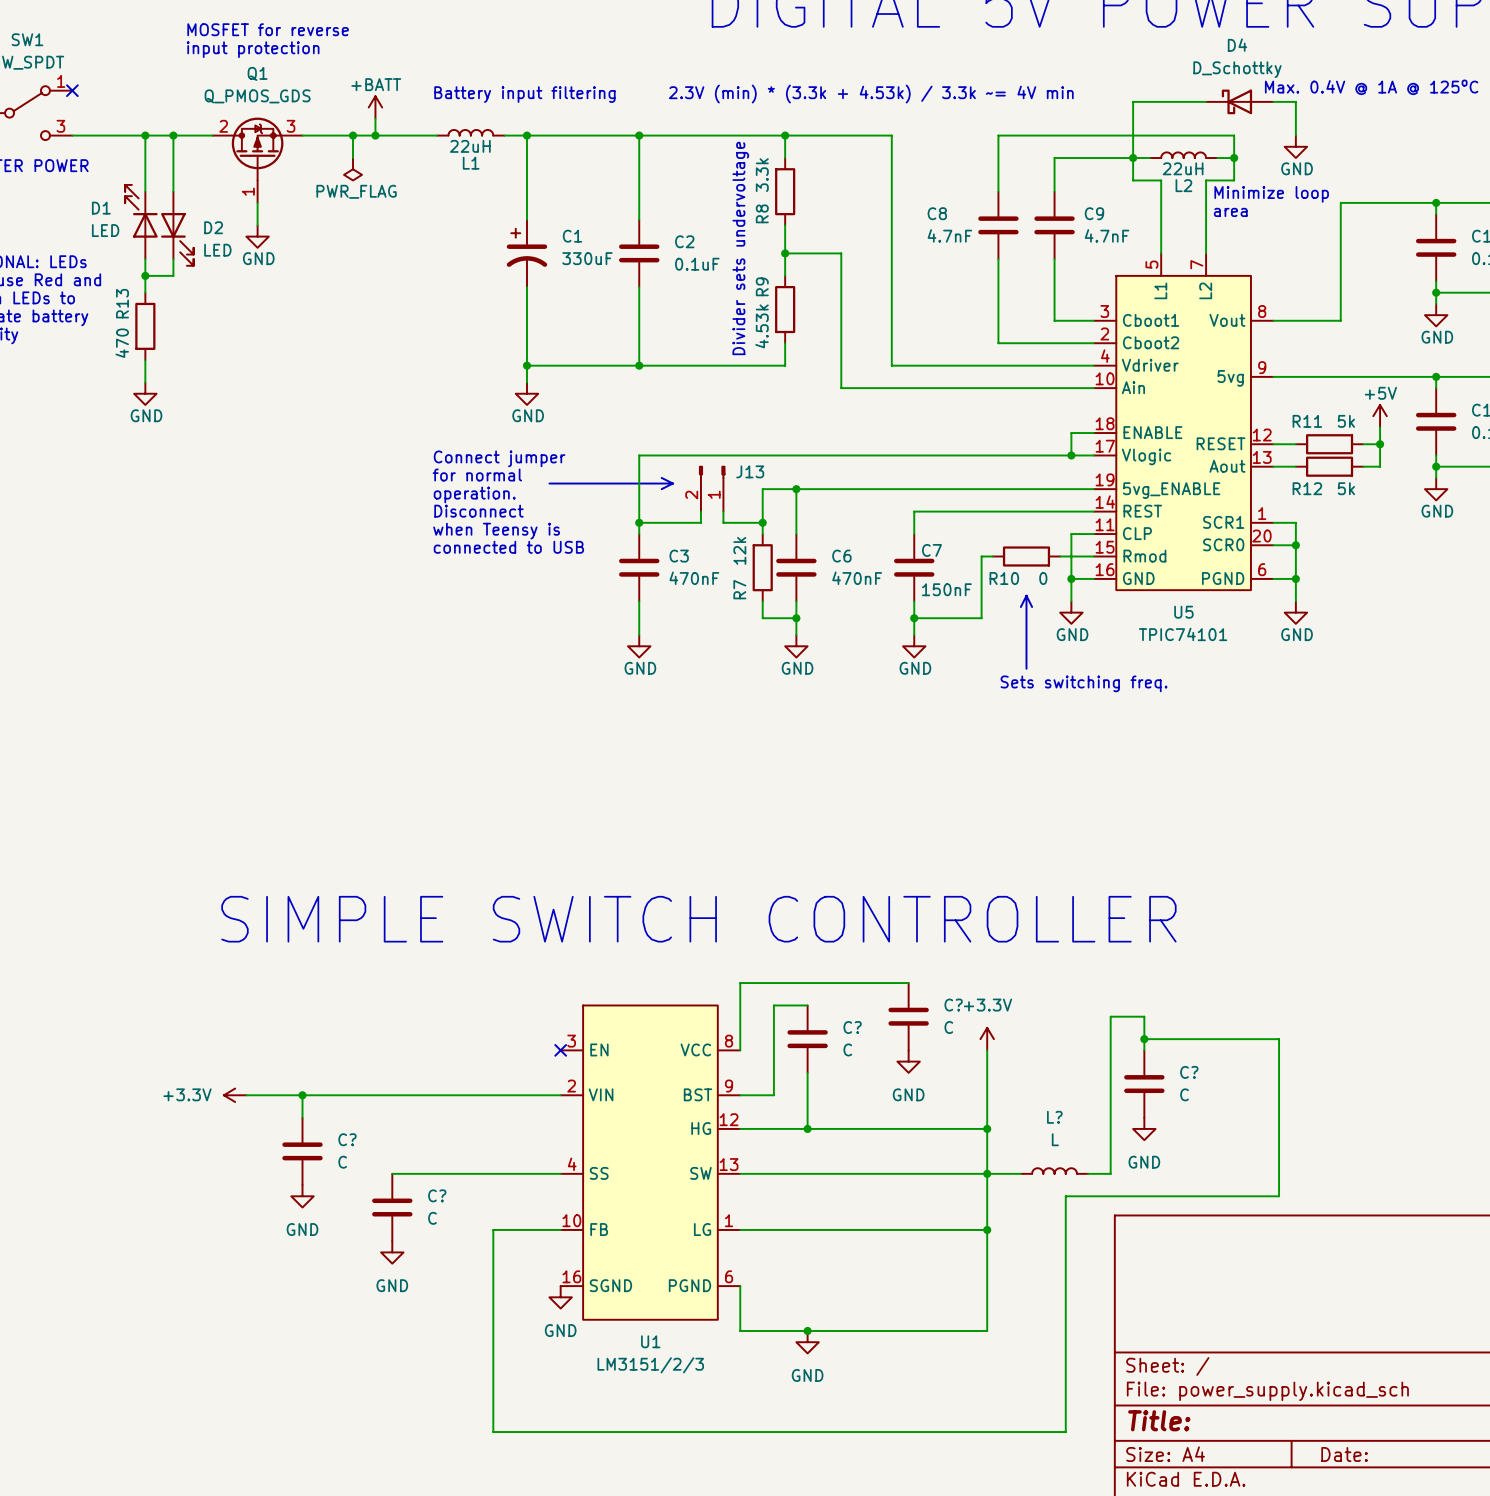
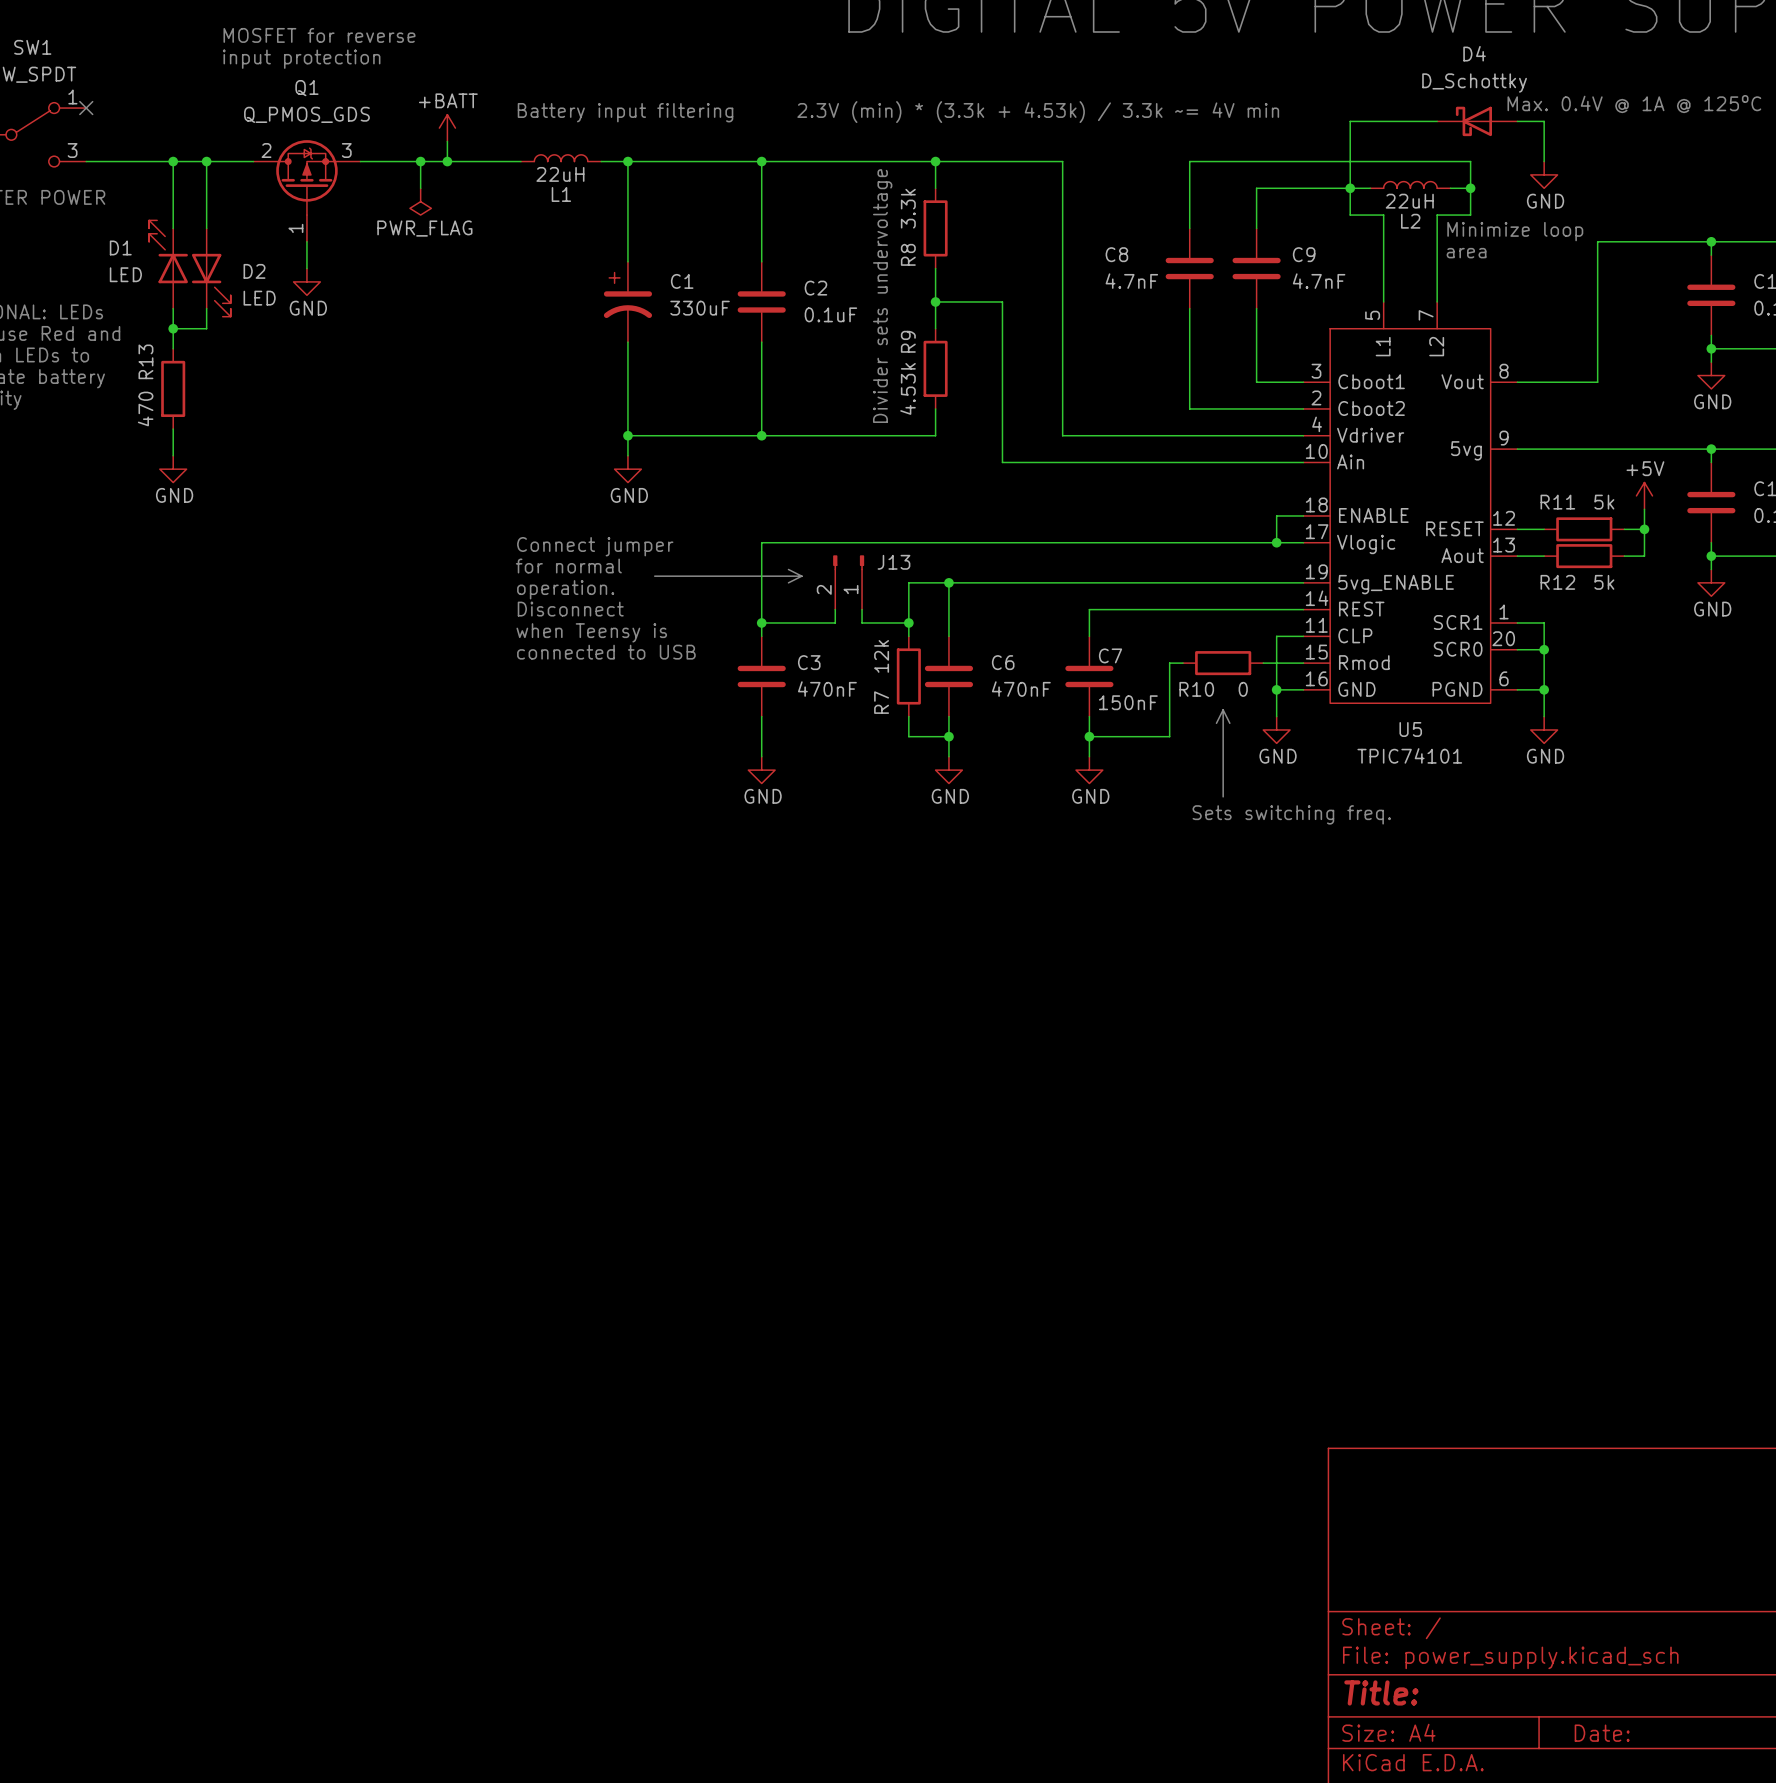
text: SIMPLE SWITCH CONTROLLER (698, 919) -> none
wire: (908, 983) (740, 983) (740, 1050) -> none
wire: (807, 1005) (773, 1005) (773, 1095) (740, 1095) -> none
C?: C (908, 1016) -> none
C?: C (807, 1039) -> none
power symbol: +3.3V (987, 1039) -> none
wire: (1144, 1039) (1279, 1039) (1279, 1196) (1065, 1196) (1065, 1432) (493, 1432) (493, 1229) (560, 1229) -> none
junction: (1144, 1039) -> none
no-connect mark: (560, 1050) -> none
wire: (987, 1050) (987, 1330) (740, 1330) (740, 1286) -> none
wire: (1144, 1050) (1144, 1016) (1110, 1016) (1110, 1173) (1088, 1173) -> none
power symbol: GND (908, 1061) -> none
wire: (807, 1072) (807, 1128) -> none
C?: C (1144, 1084) -> none
power symbol: +3.3V (235, 1095) -> none
wire: (246, 1095) (560, 1095) -> none
wire: (302, 1095) (302, 1117) -> none
junction: (302, 1095) -> none
wire: (740, 1128) (987, 1128) -> none
junction: (807, 1128) -> none
junction: (987, 1128) -> none
power symbol: GND (1144, 1128) -> none
C?: C (302, 1151) -> none
U1: LM3151/2/3 (650, 1162) -> none
L?: L (1054, 1171) -> none
wire: (392, 1173) (560, 1173) -> none
wire: (740, 1173) (1020, 1173) -> none
junction: (987, 1173) -> none
power symbol: GND (302, 1196) -> none
C?: C (392, 1207) -> none
wire: (740, 1229) (987, 1229) -> none
junction: (987, 1229) -> none
power symbol: GND (392, 1252) -> none
power symbol: GND (560, 1297) -> none
junction: (807, 1330) -> none
power symbol: GND (807, 1342) -> none

